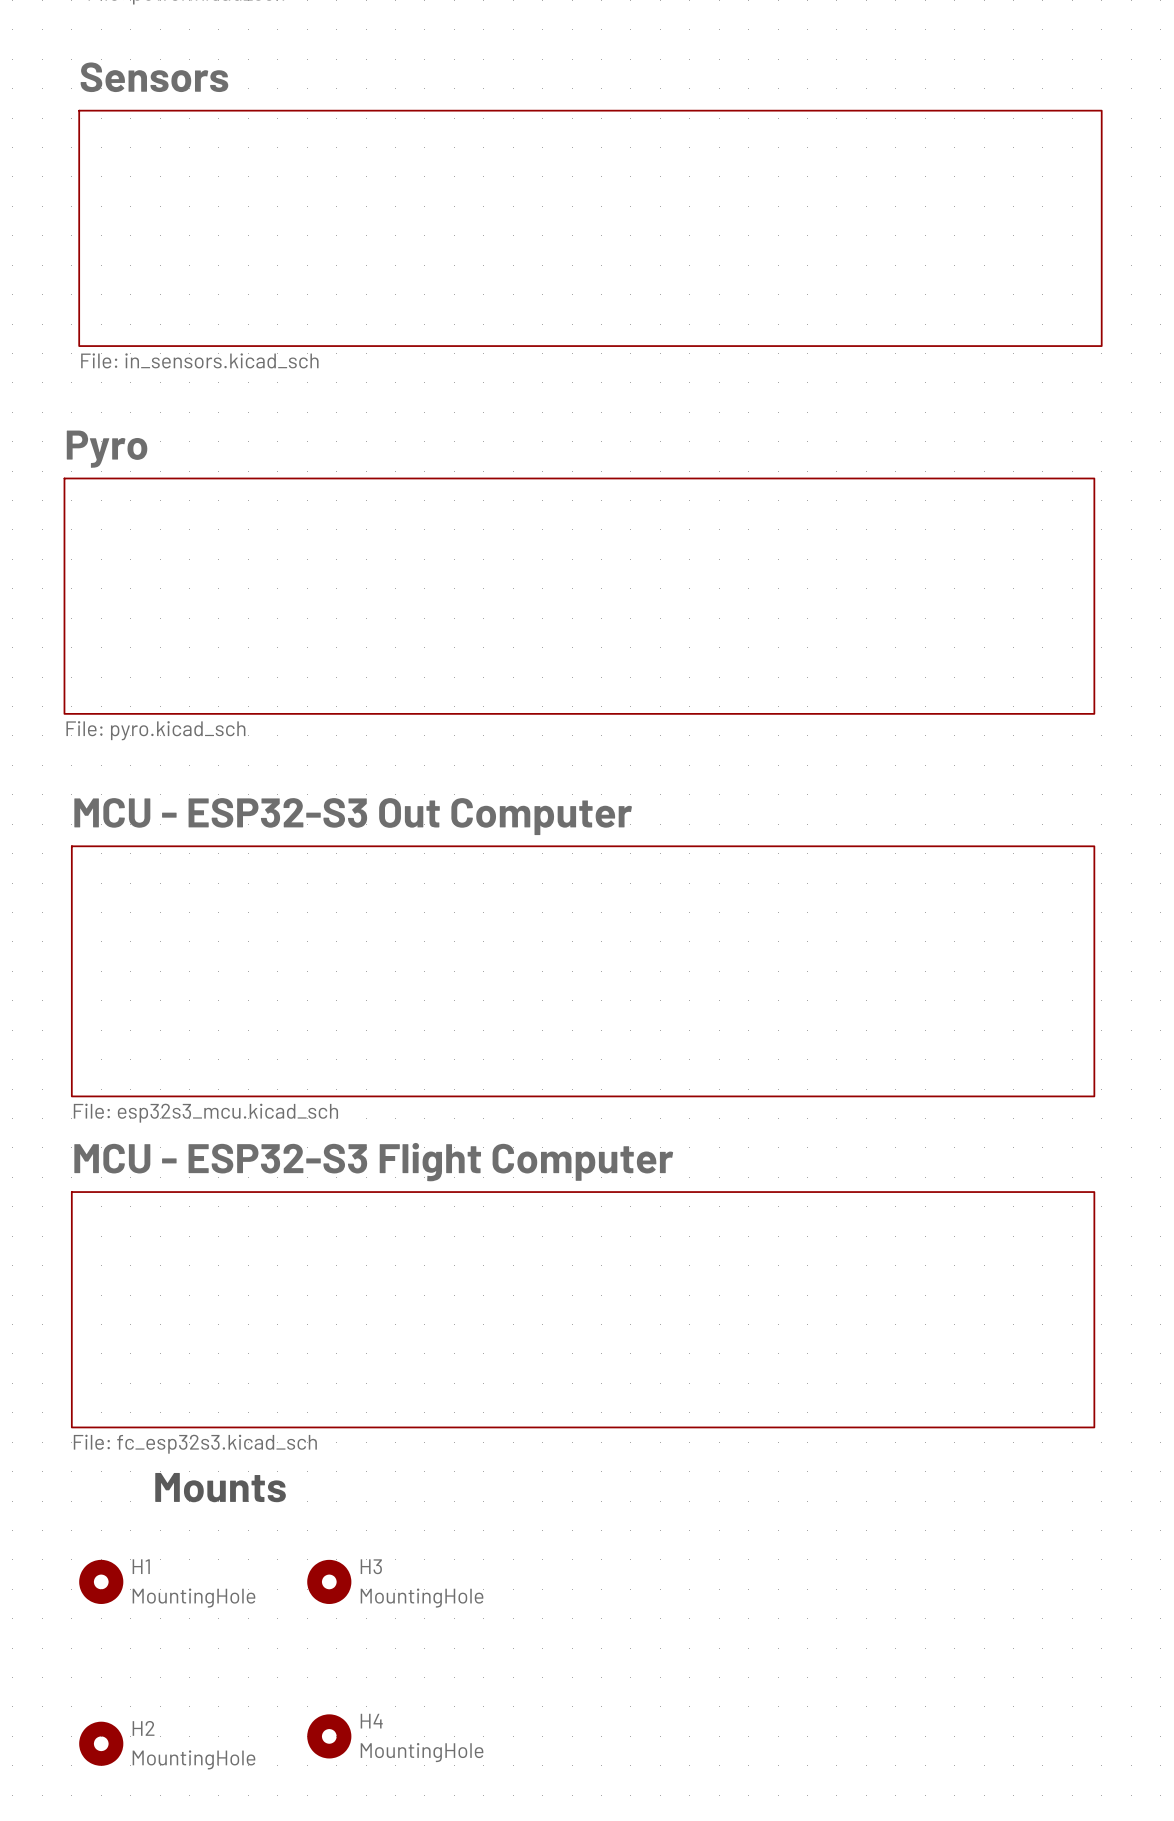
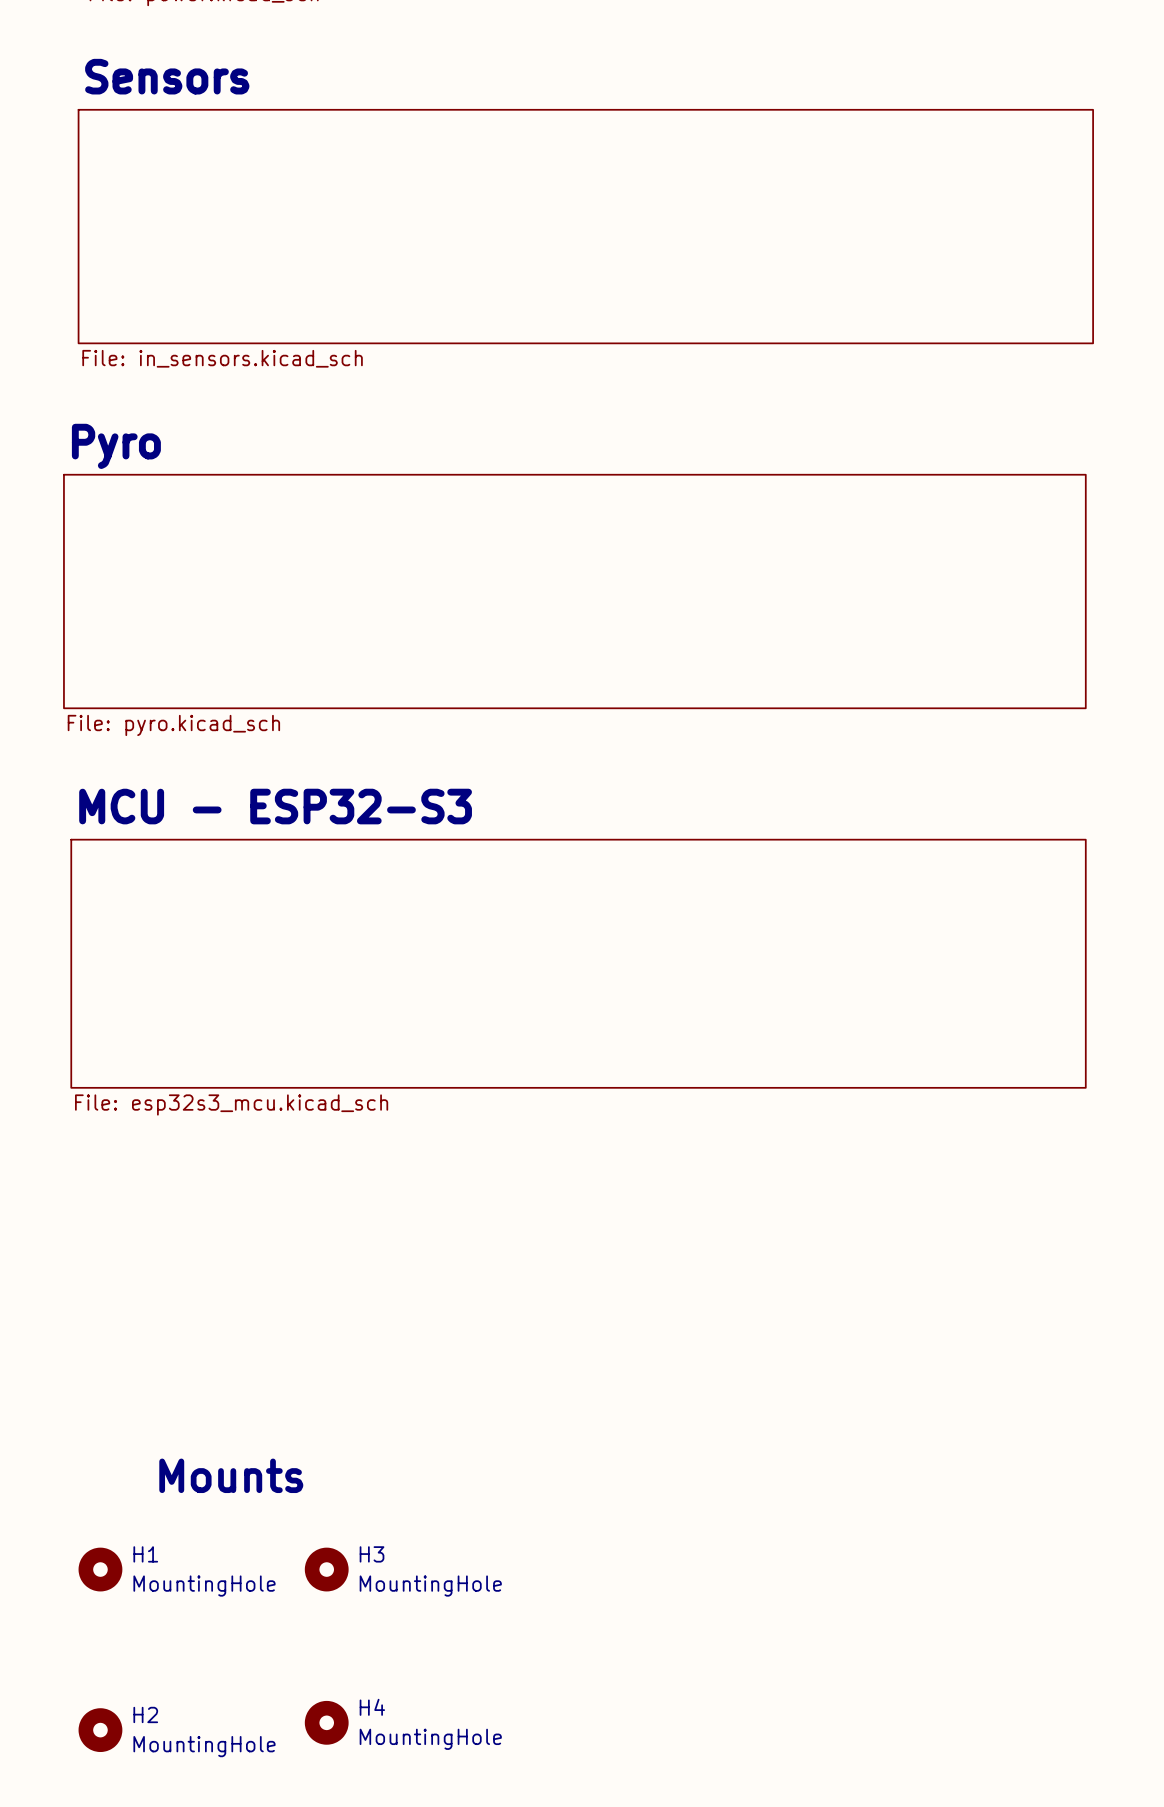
sheet MCU - ESP32-S3 Out Computer name: MCU - ESP32-S3 Out Computer (353, 816) -> MCU - ESP32-S3 (275, 806)
sheet MCU - ESP32-S3 Flight Computer: File: fc_esp32s3.kicad_sch (583, 1309) -> none

